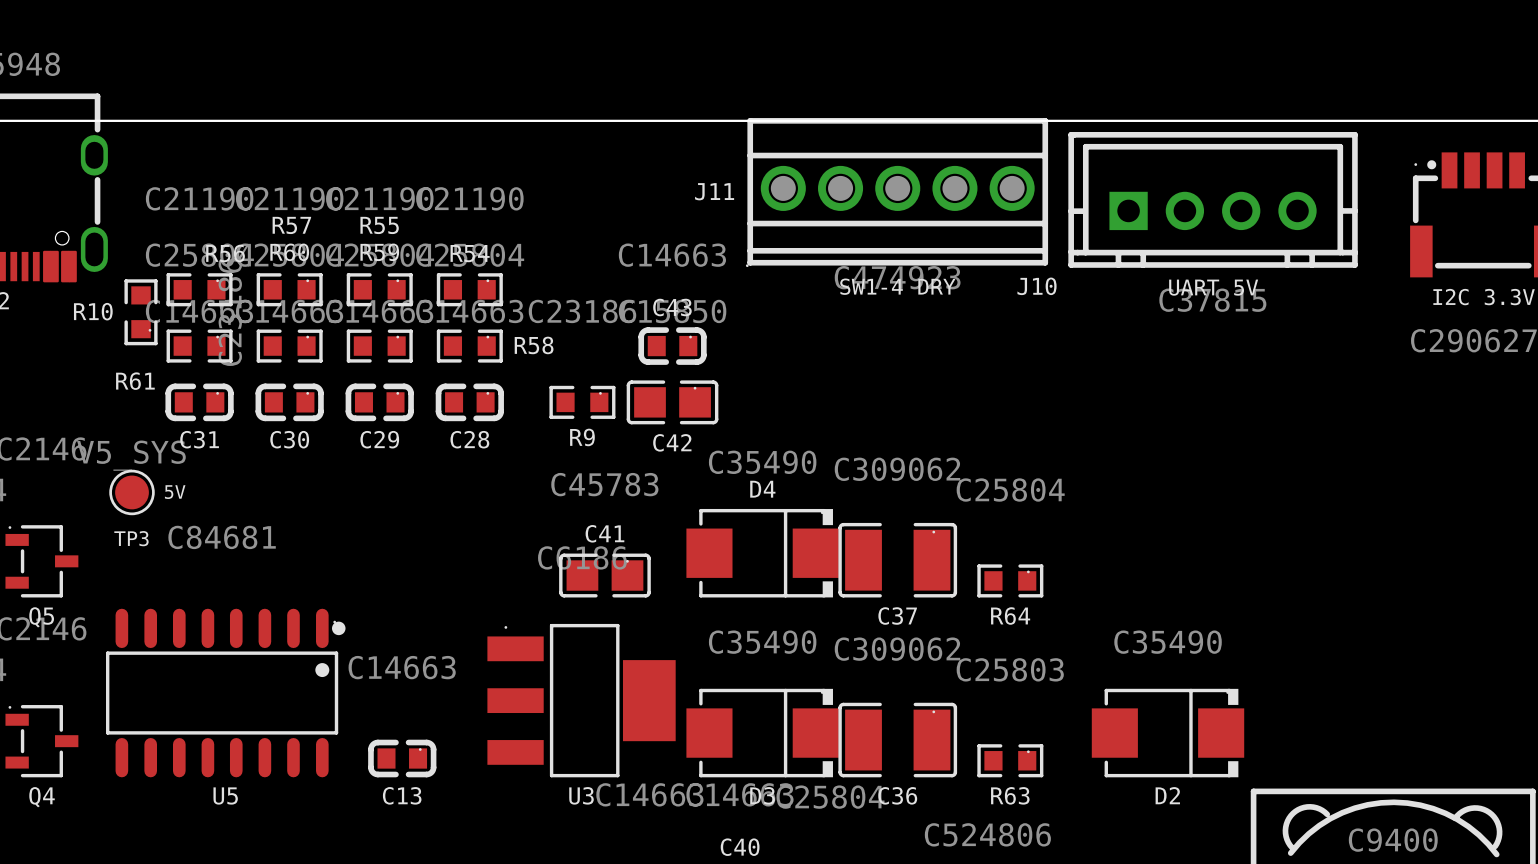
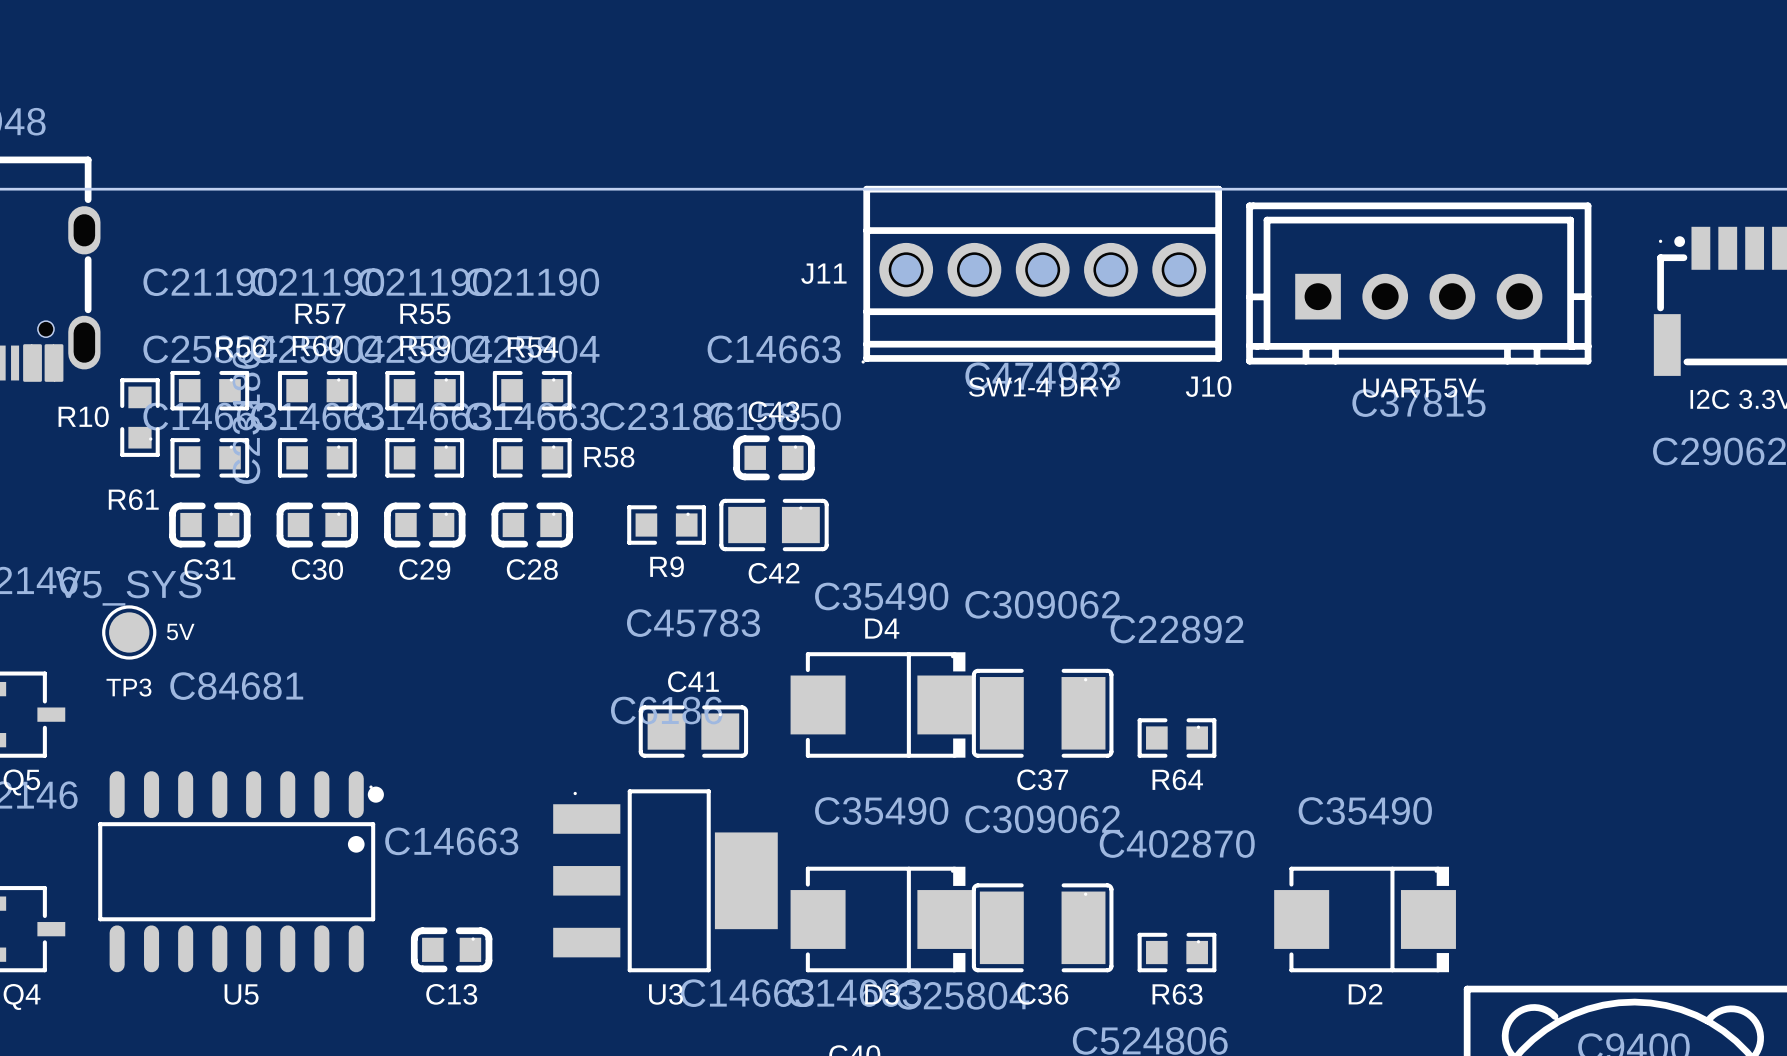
R64 value: C25804 (1010, 490) -> C22892 (1177, 629)
R63 value: C25803 (1010, 669) -> C402870 (1177, 844)

